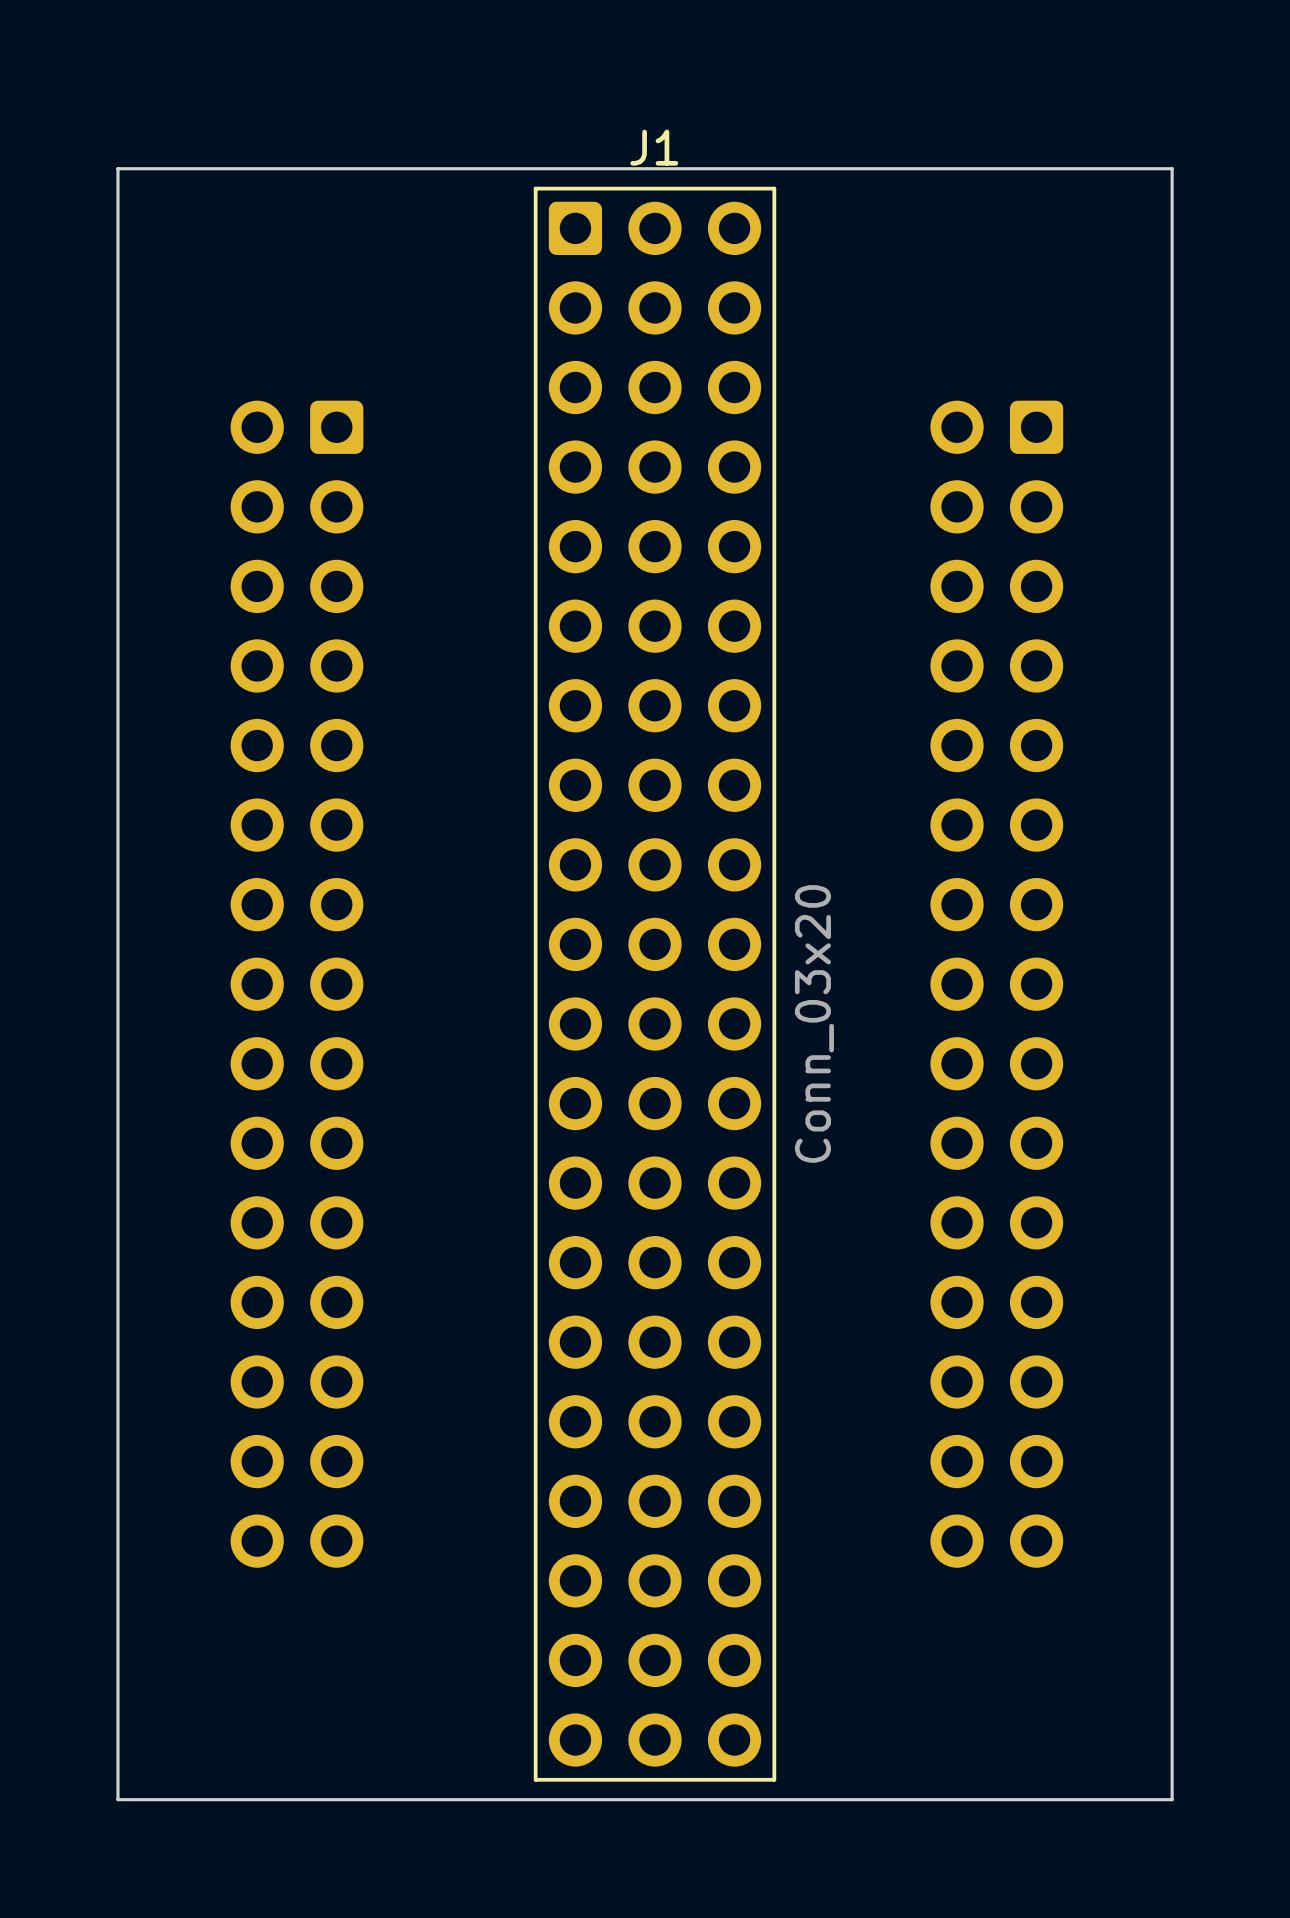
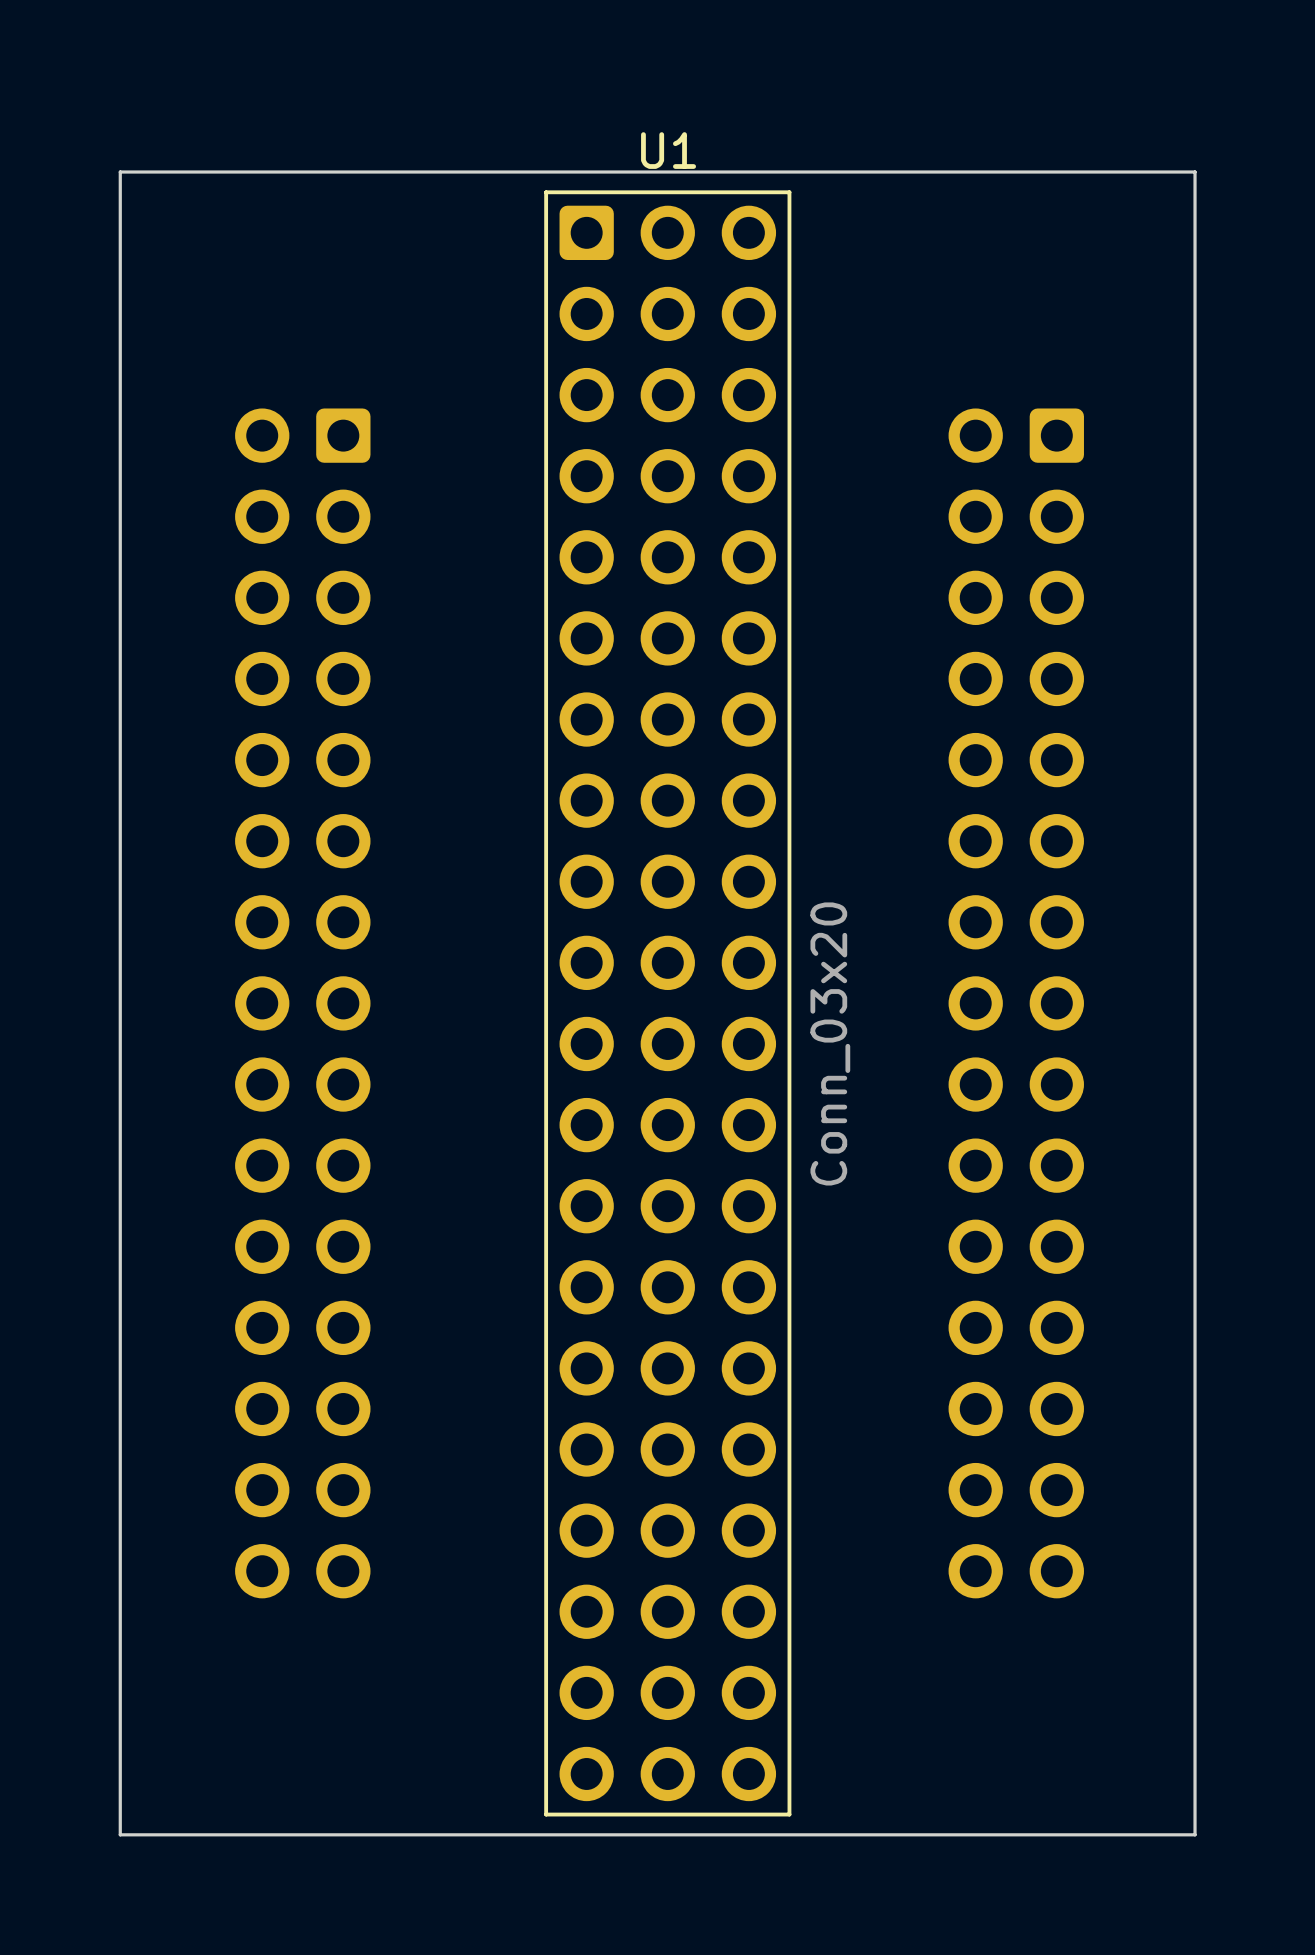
J1 name: J1 (654, 147) -> U1 (668, 150)

